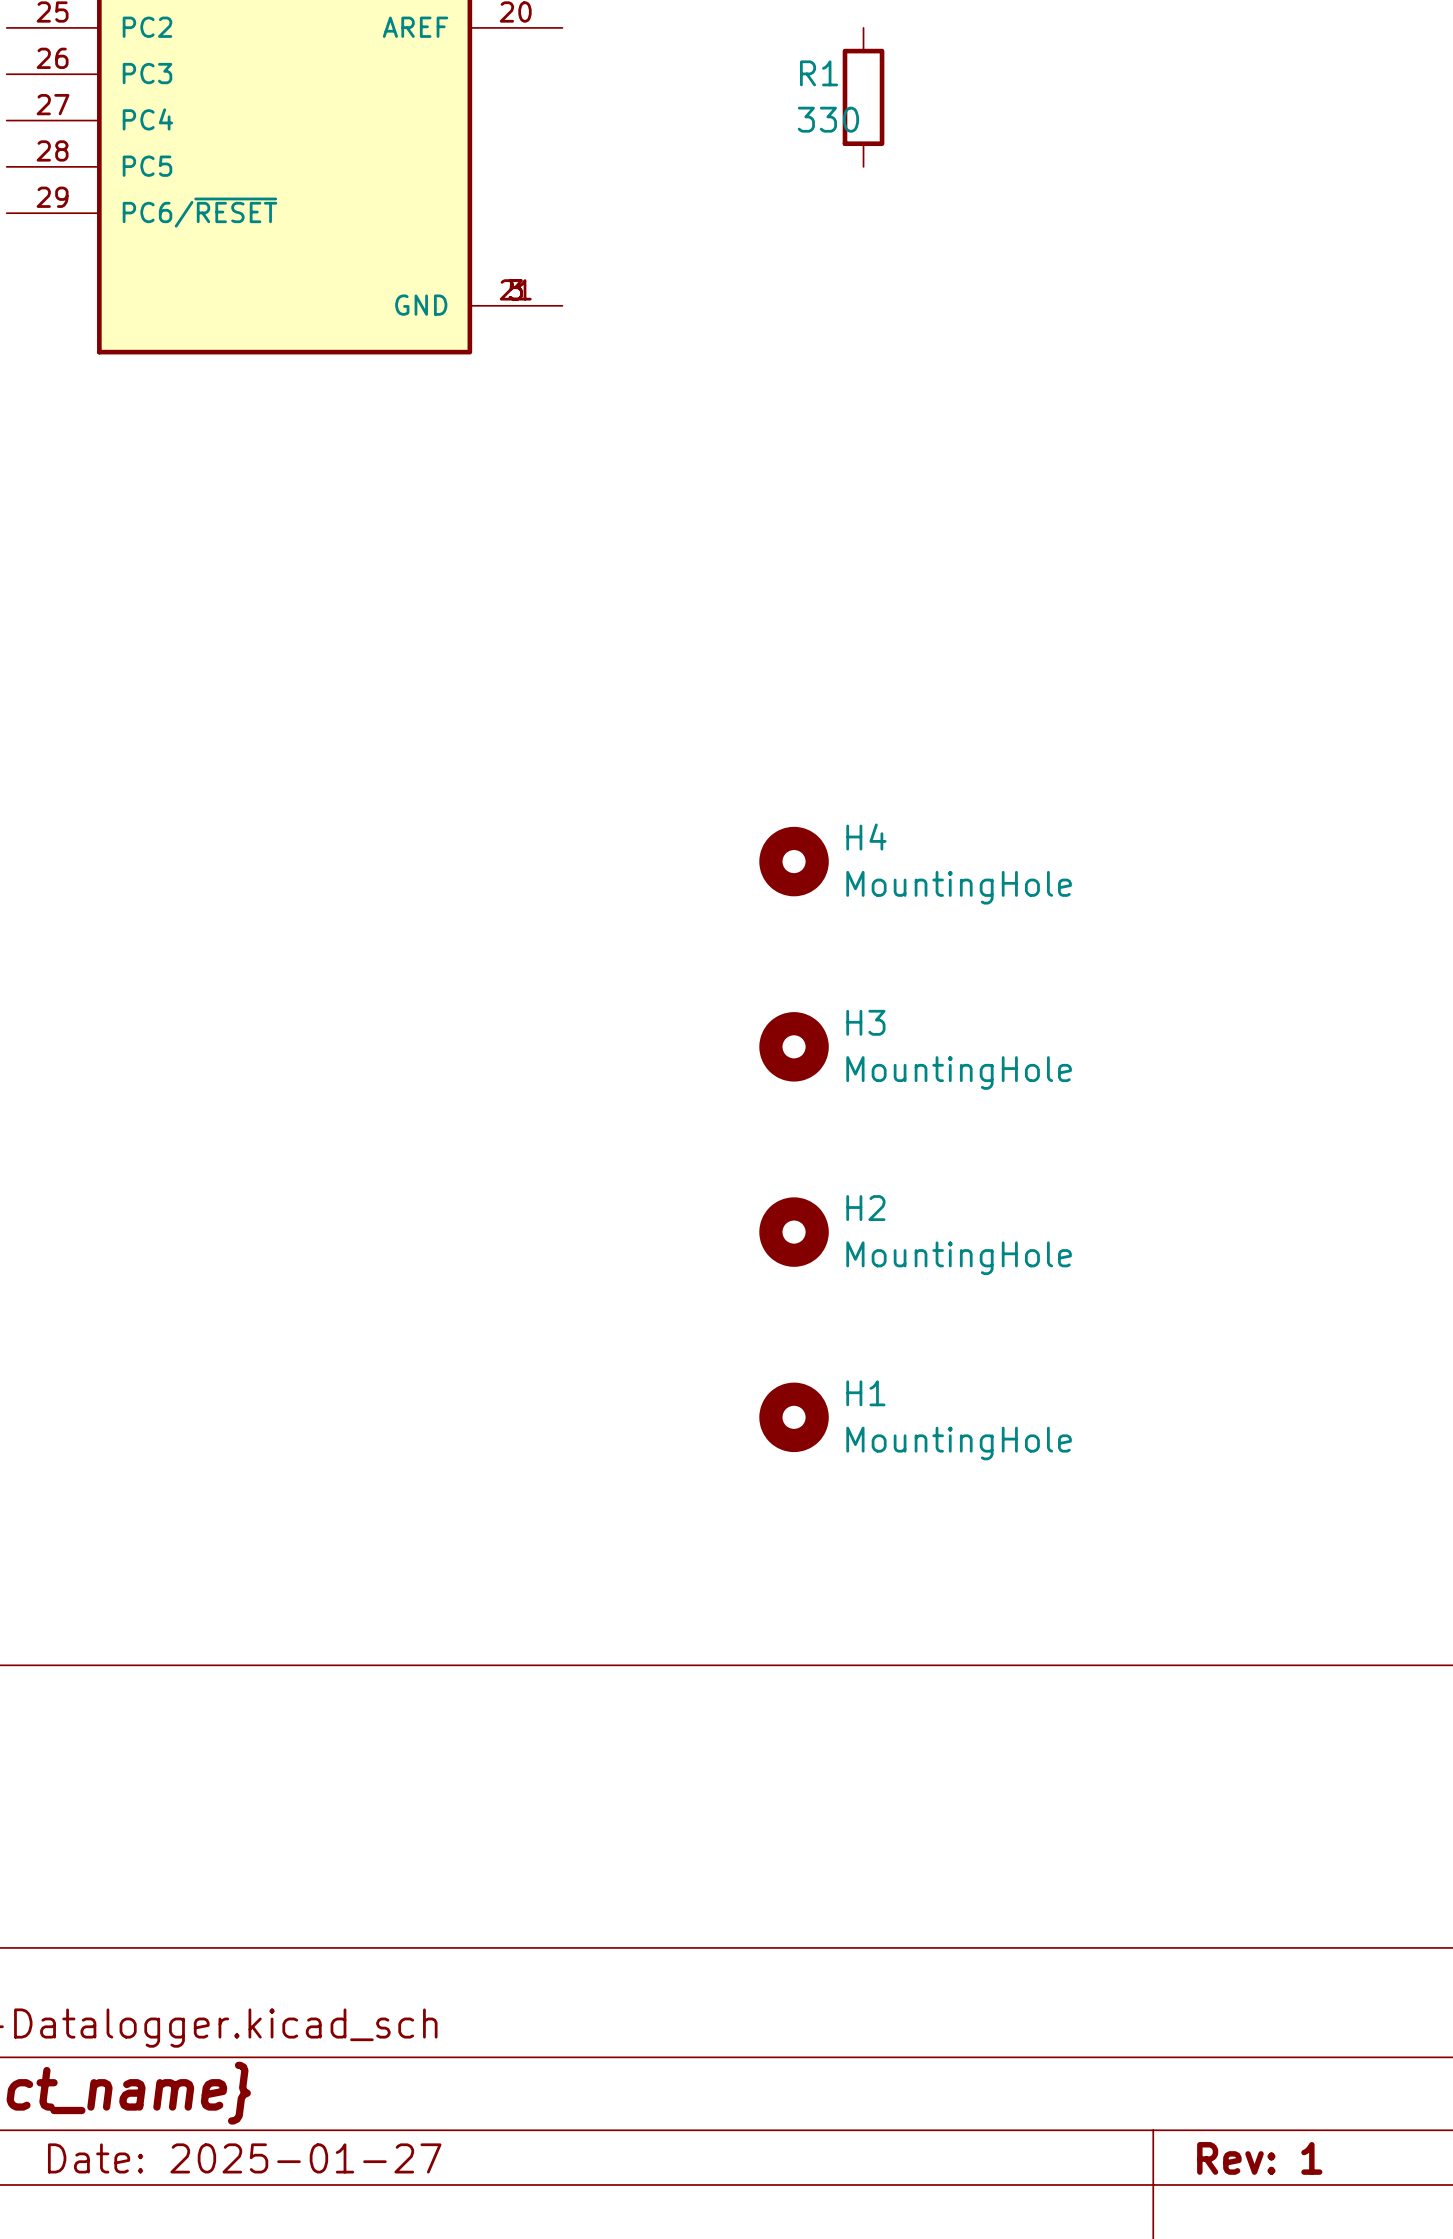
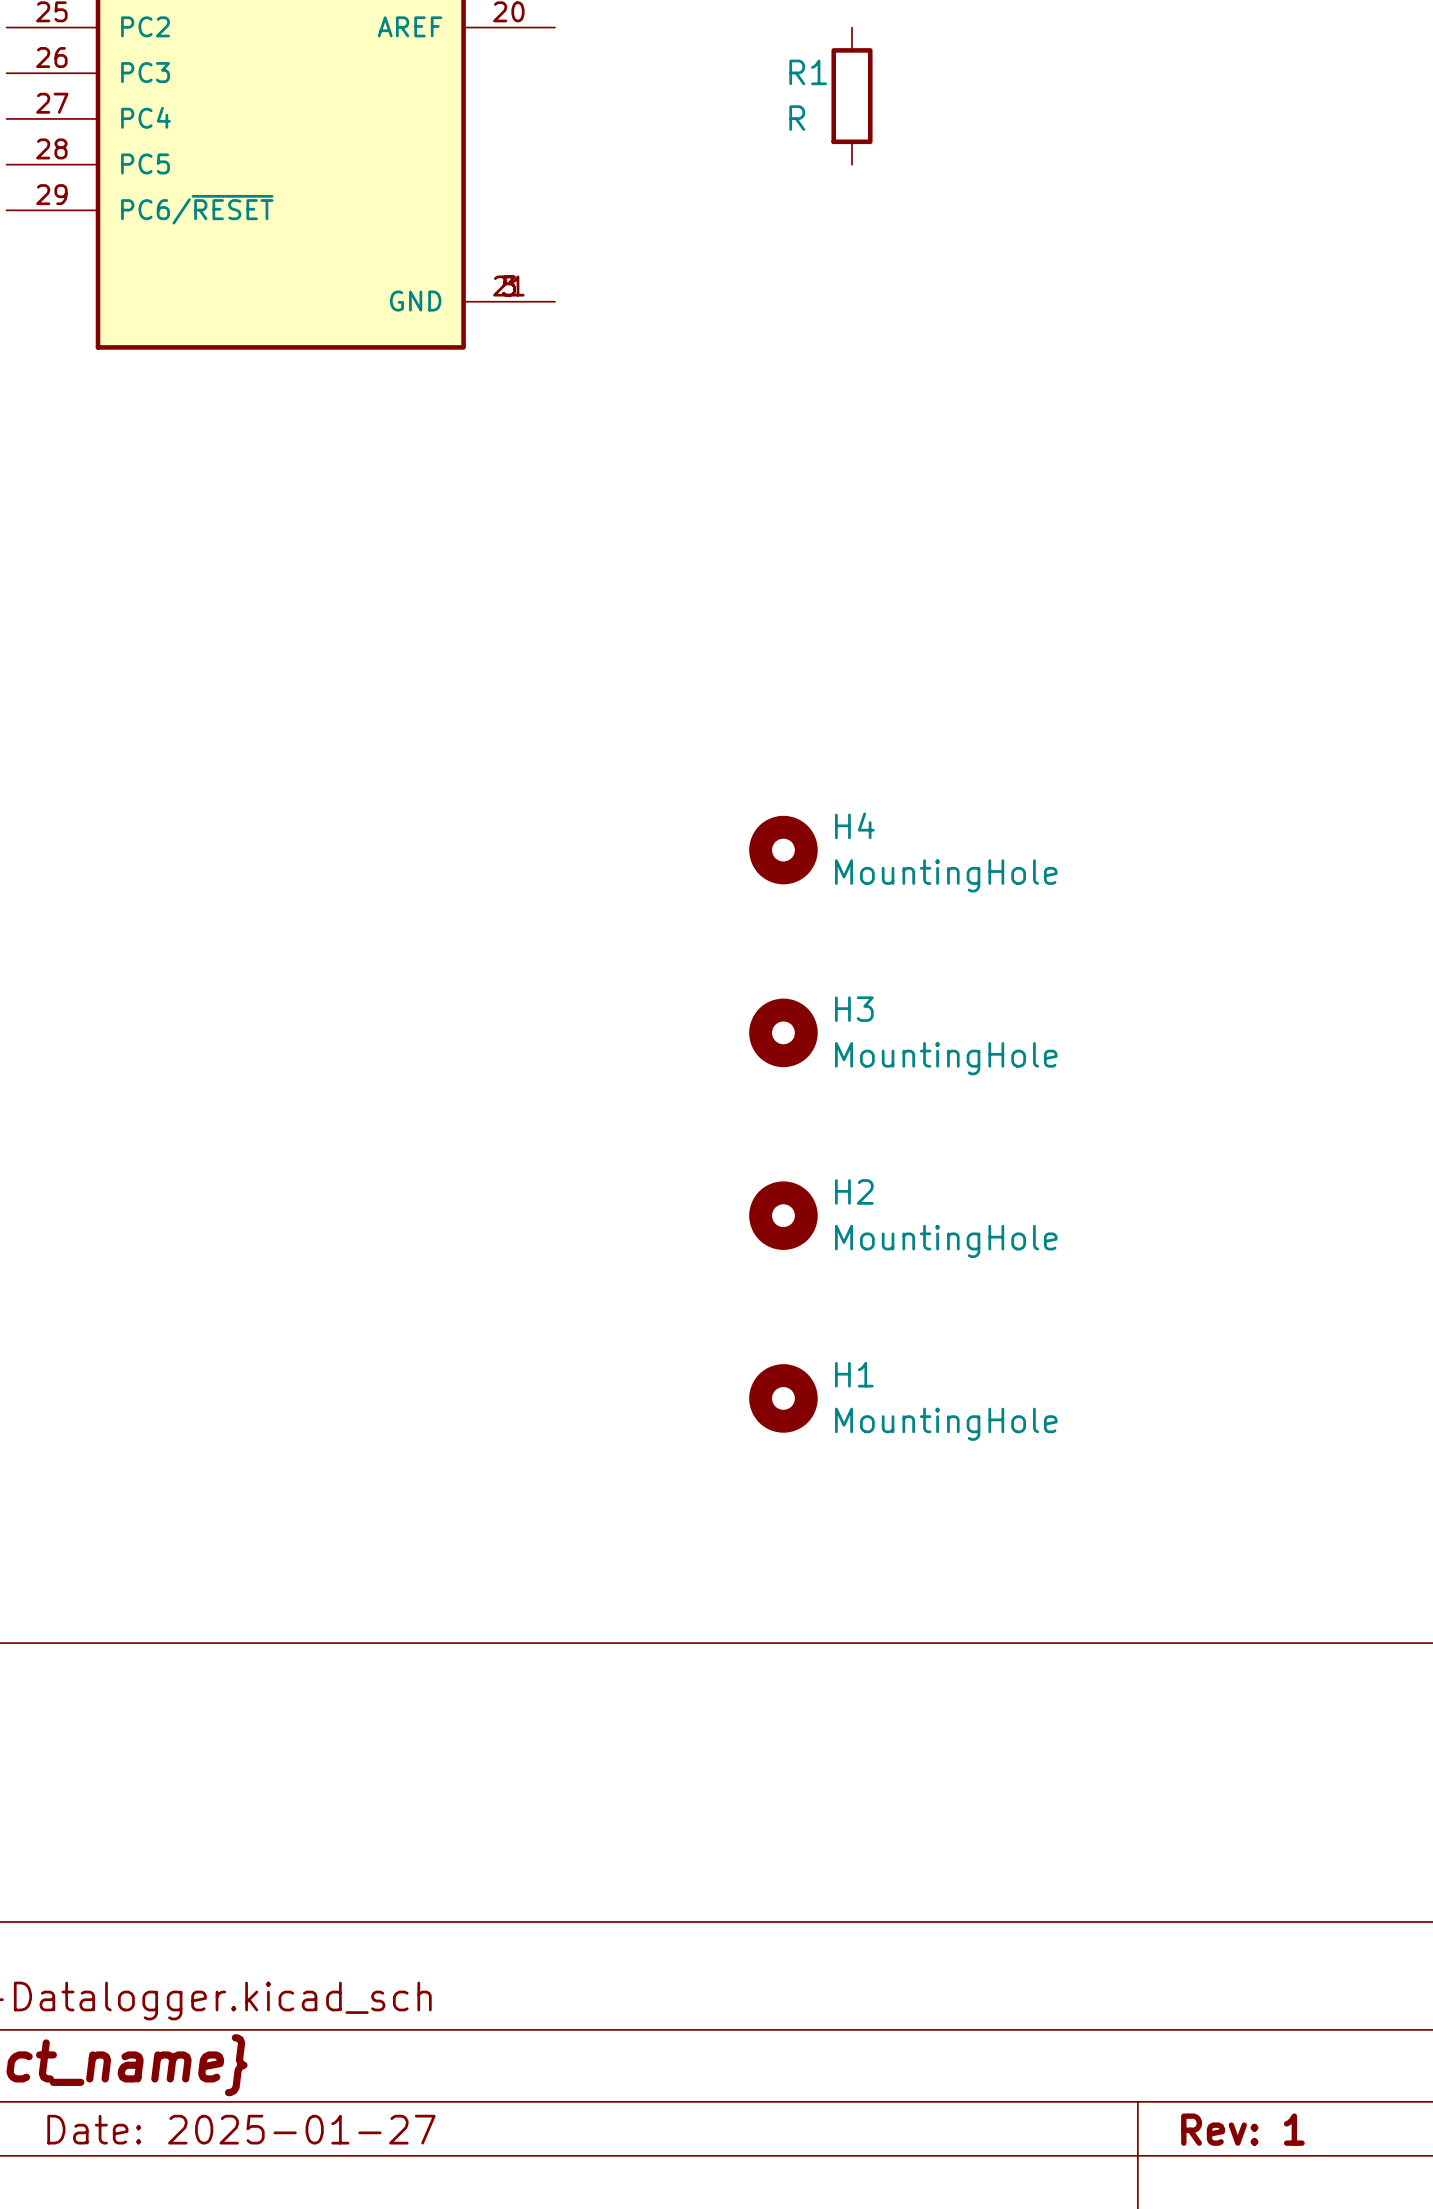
R1 value: 330 (828, 119) -> R (797, 118)

